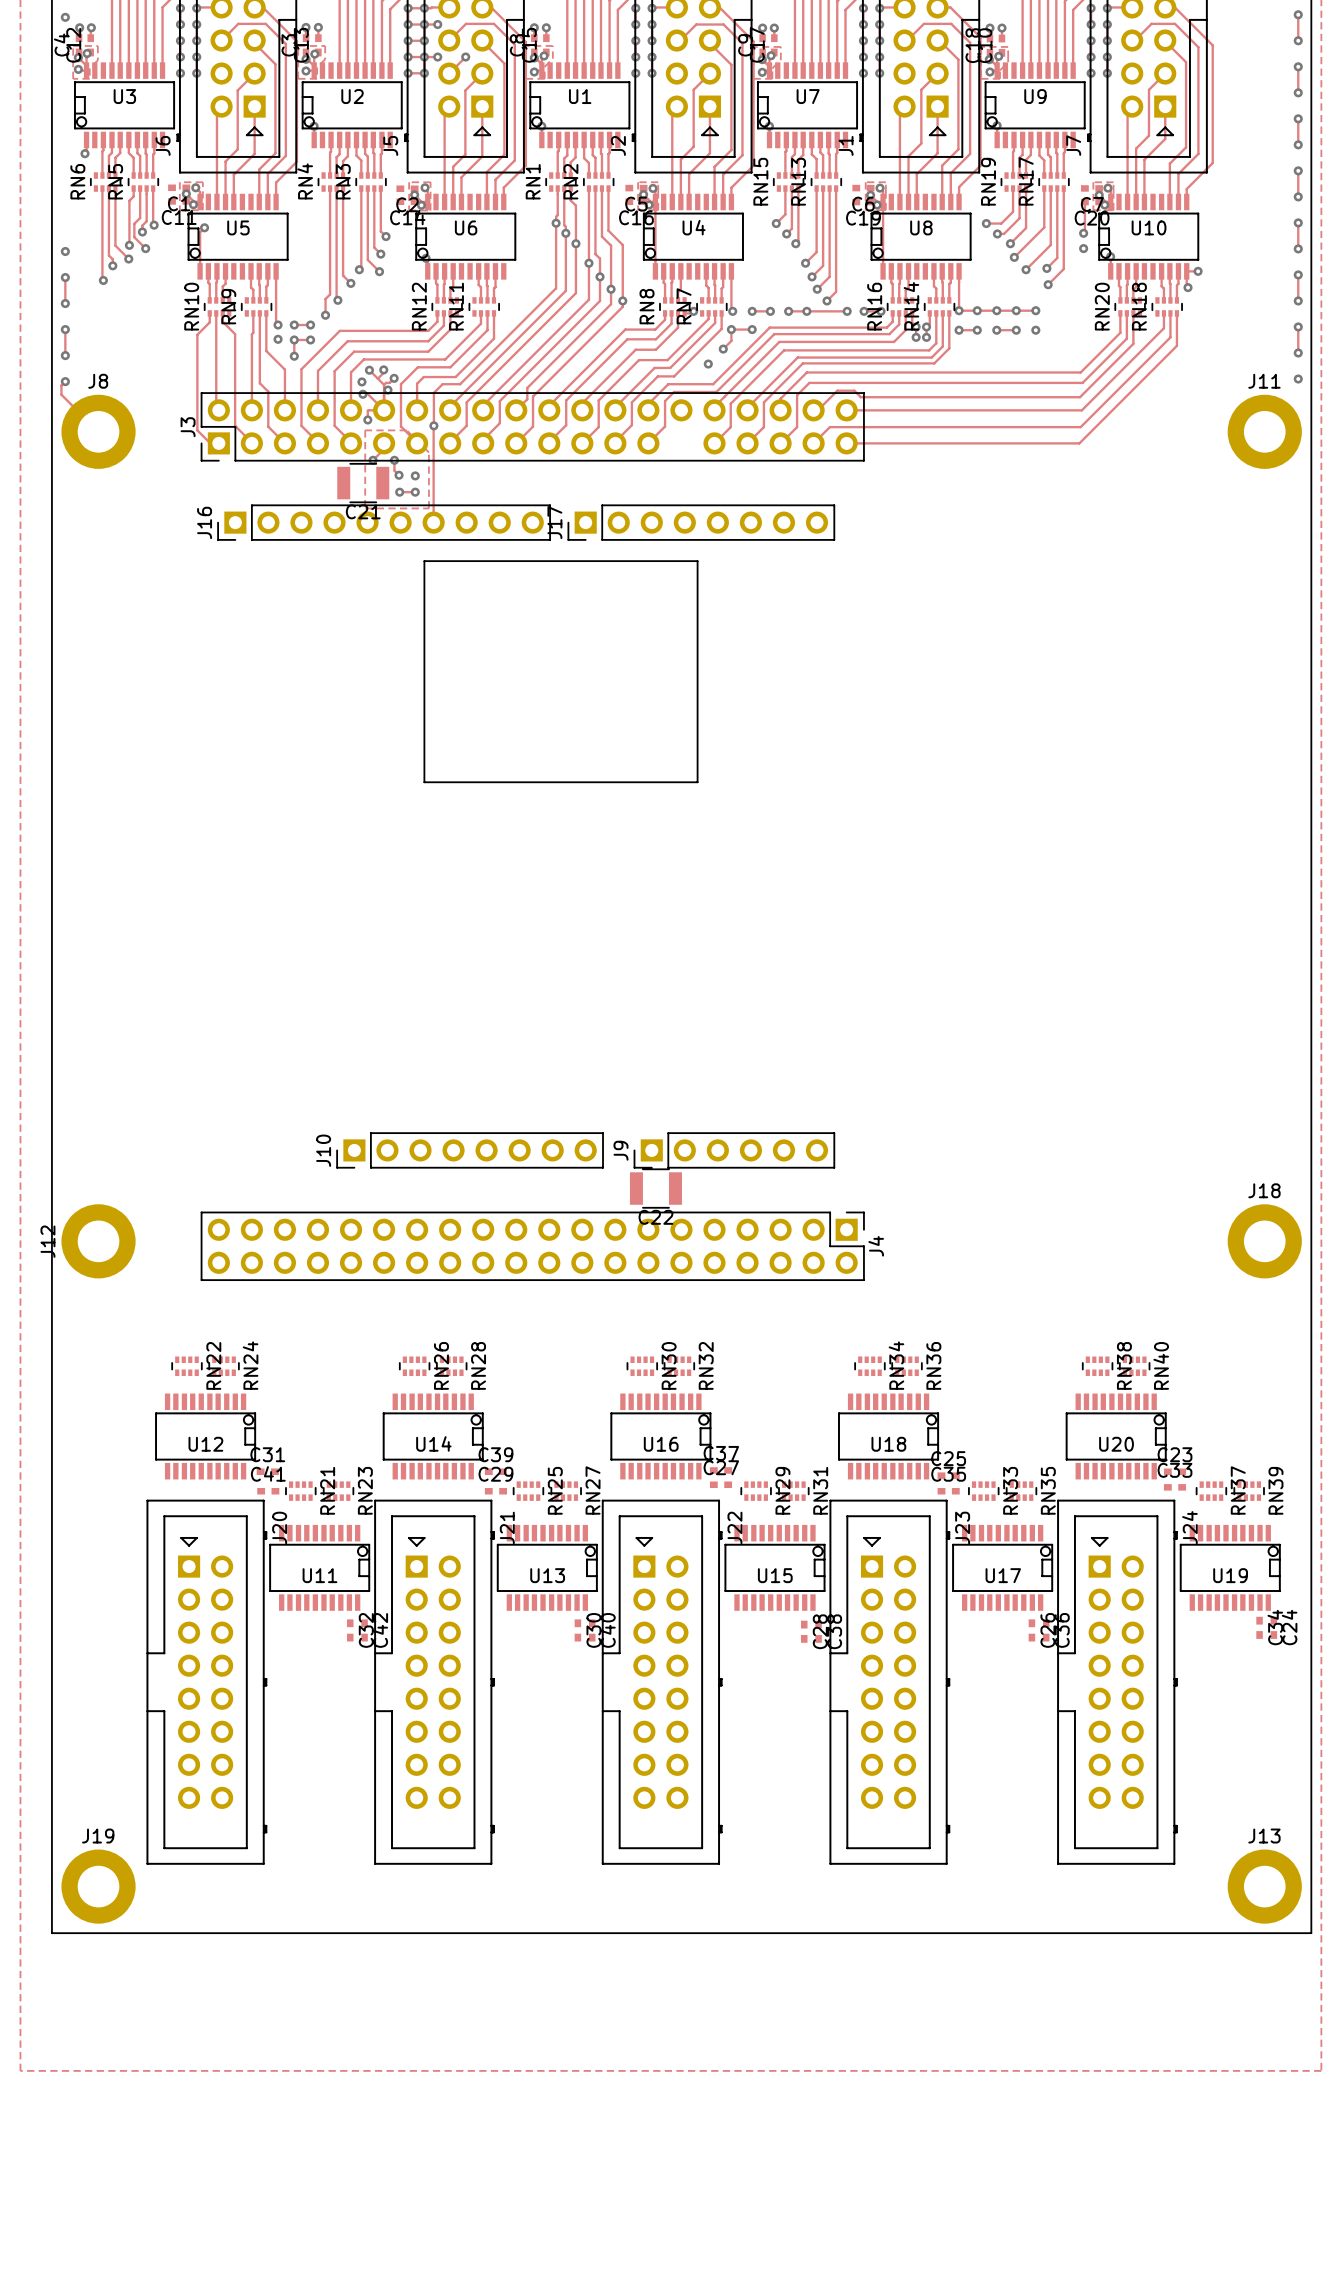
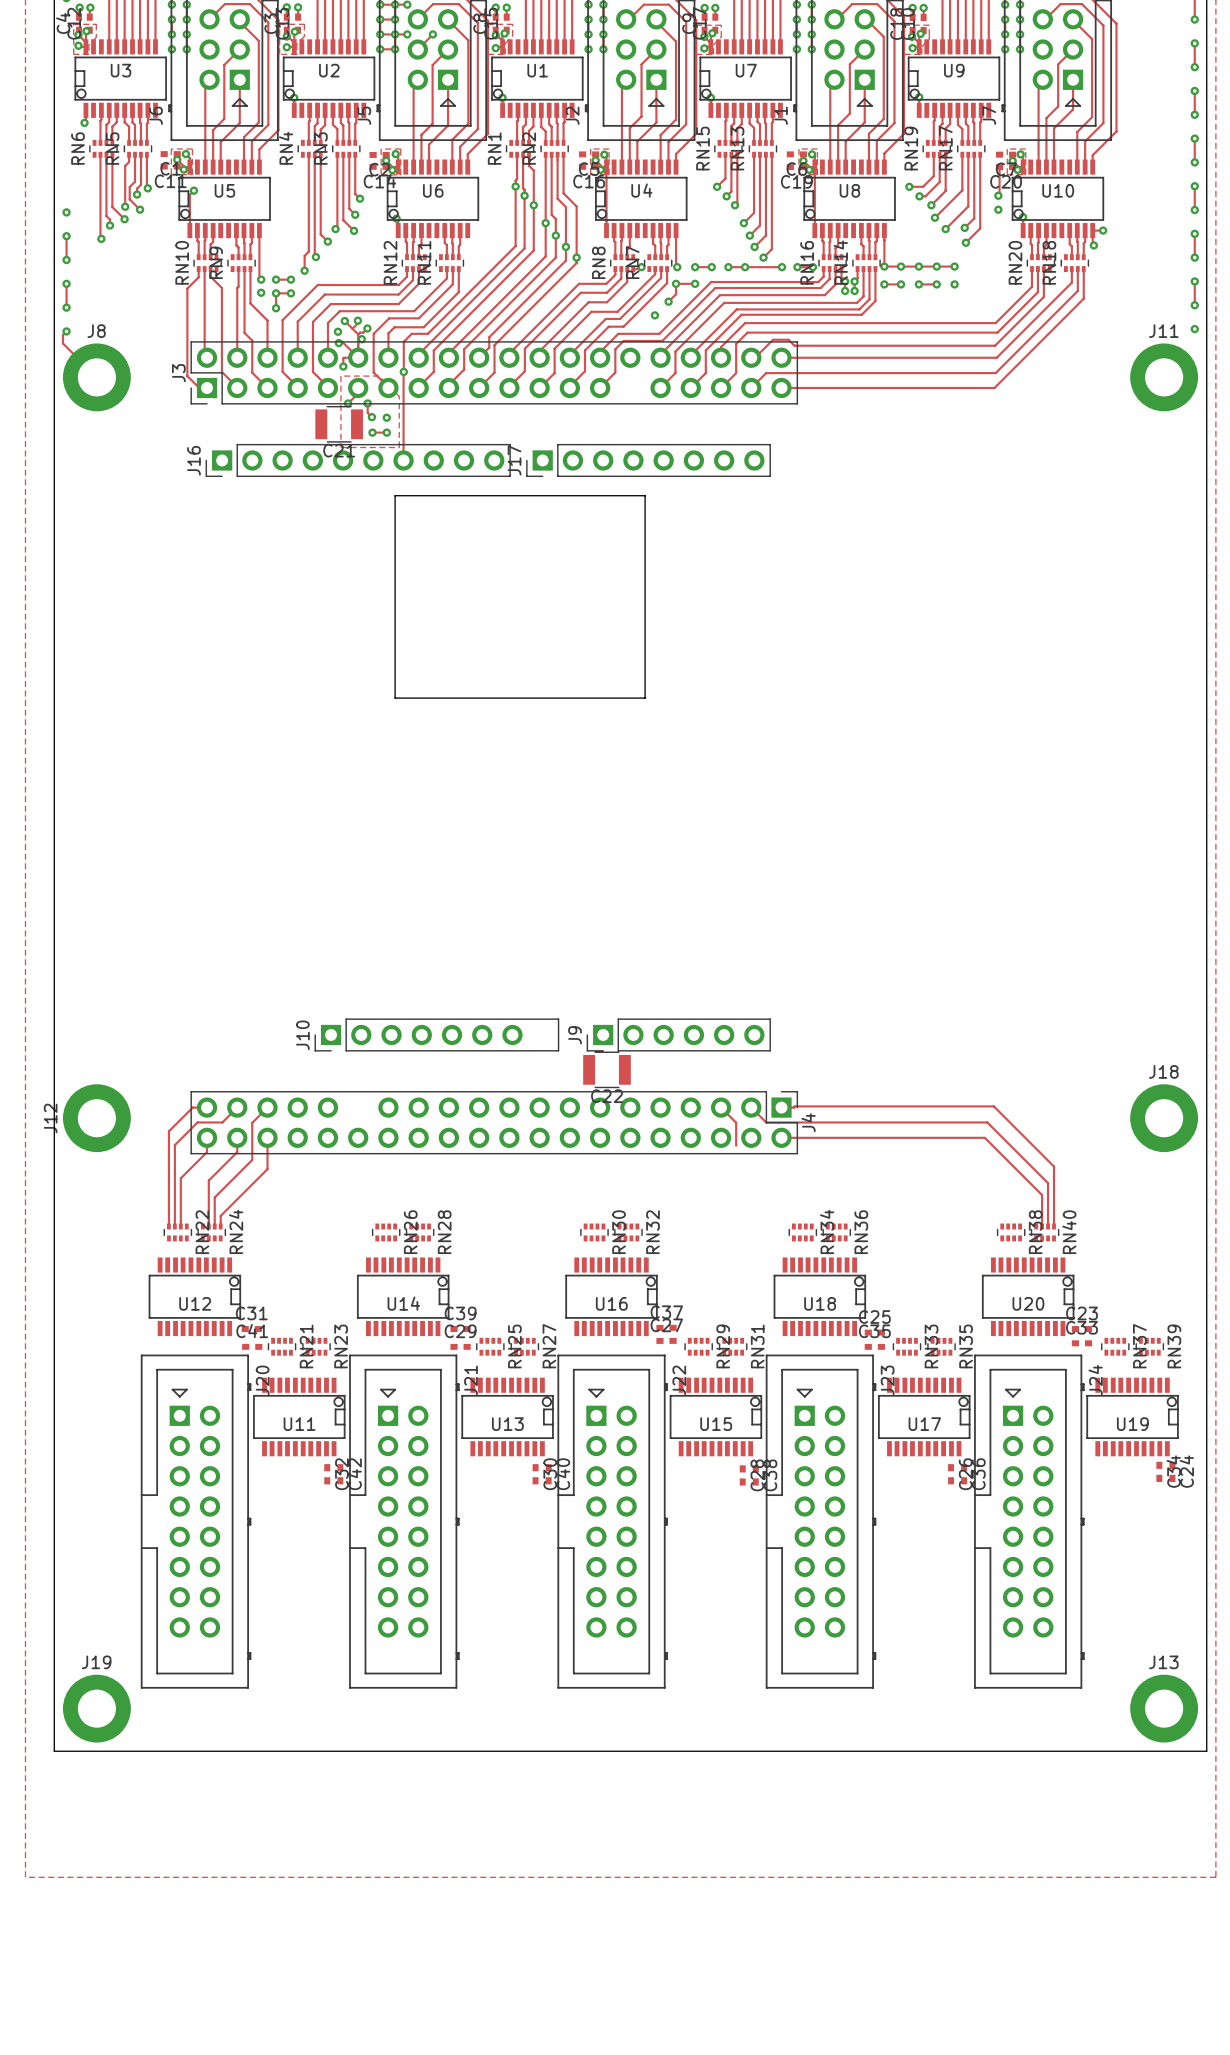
J10 footprint: [336, 1132, 604, 1169] -> [314, 1018, 560, 1052]
J4 footprint: [200, 1211, 865, 1281] -> [190, 1091, 799, 1155]
track: none -> (207, 1107) (192, 1107) (168, 1131) (168, 1226)
track: none -> (237, 1107) (222, 1122) (197, 1122) (174, 1145) (174, 1226)
track: none -> (267, 1107) (252, 1122) (252, 1159) (214, 1197) (214, 1226)
track: none -> (721, 1107) (736, 1122) (736, 1145)
track: none -> (751, 1107) (766, 1122) (987, 1122) (1048, 1183) (1048, 1226)
track: none -> (781, 1107) (993, 1106) (1054, 1166) (1054, 1226)
track: none -> (207, 1137) (207, 1152) (180, 1178) (180, 1226)
track: none -> (237, 1137) (237, 1152) (208, 1180) (208, 1226)
track: none -> (267, 1137) (267, 1169) (220, 1215) (220, 1226)
track: none -> (781, 1137) (984, 1137) (1042, 1195) (1042, 1226)

